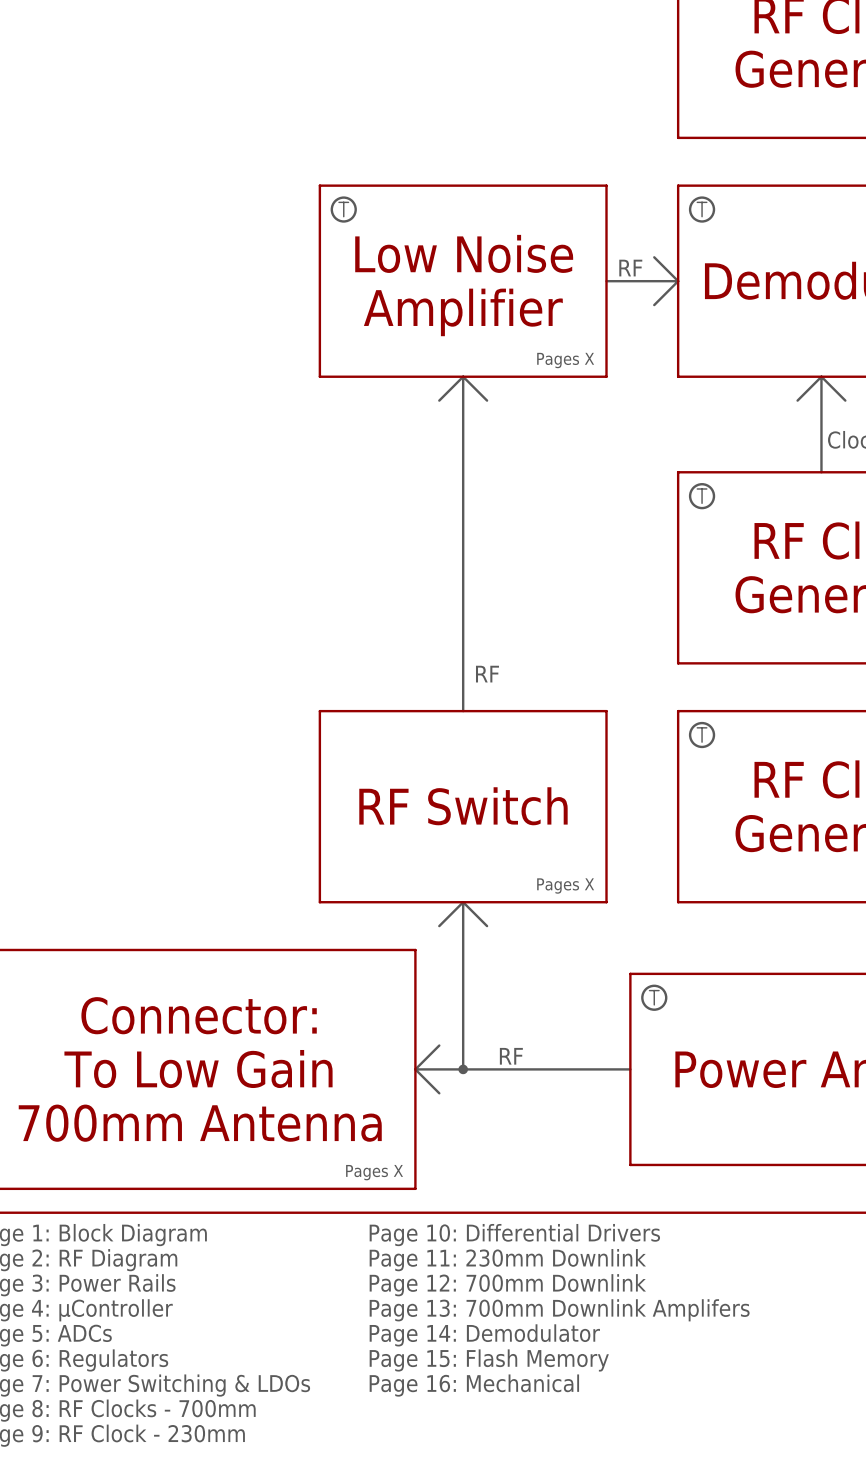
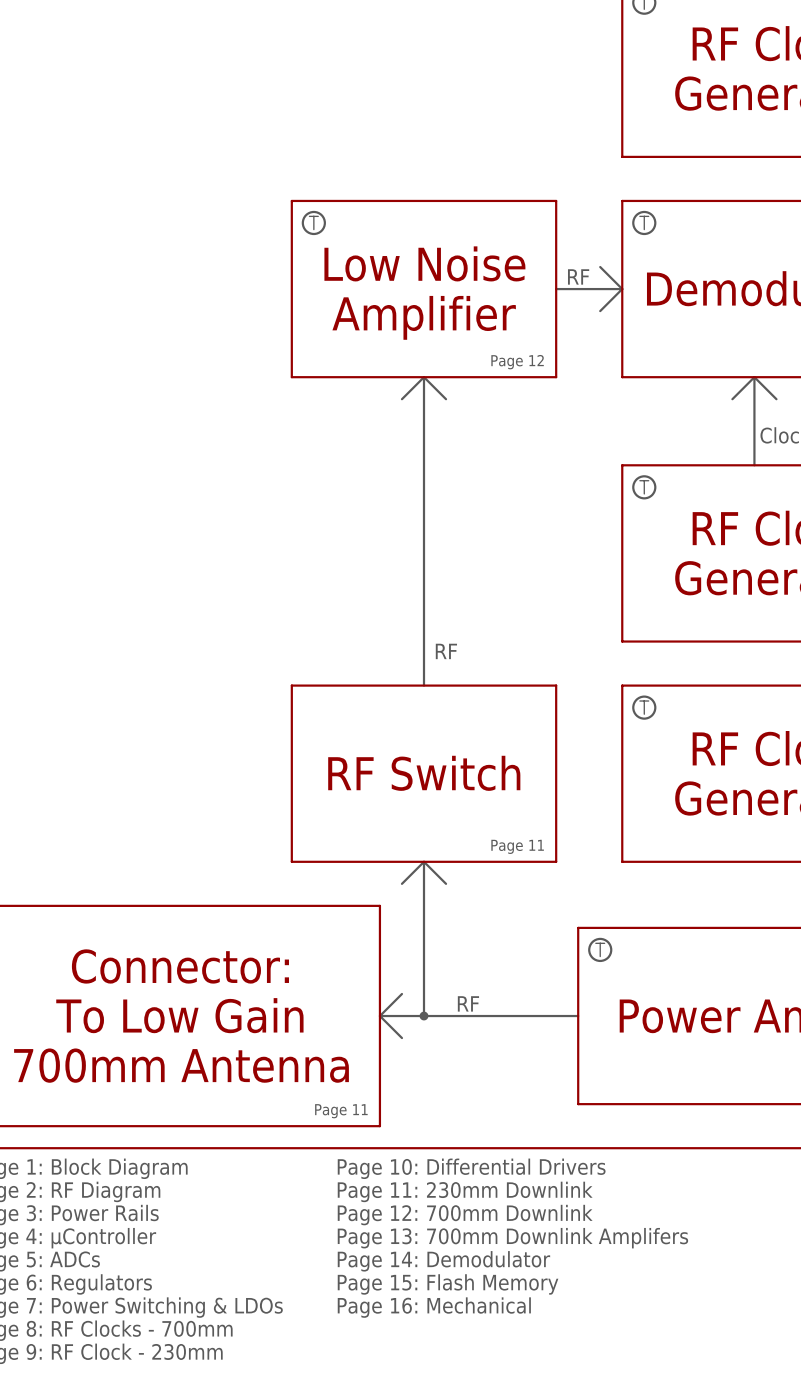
text: Pages X (565, 360) -> Page 12 (517, 362)
text: Pages X (565, 886) -> Page 11 (517, 846)
text: Pages X (374, 1172) -> Page 11 (341, 1111)

